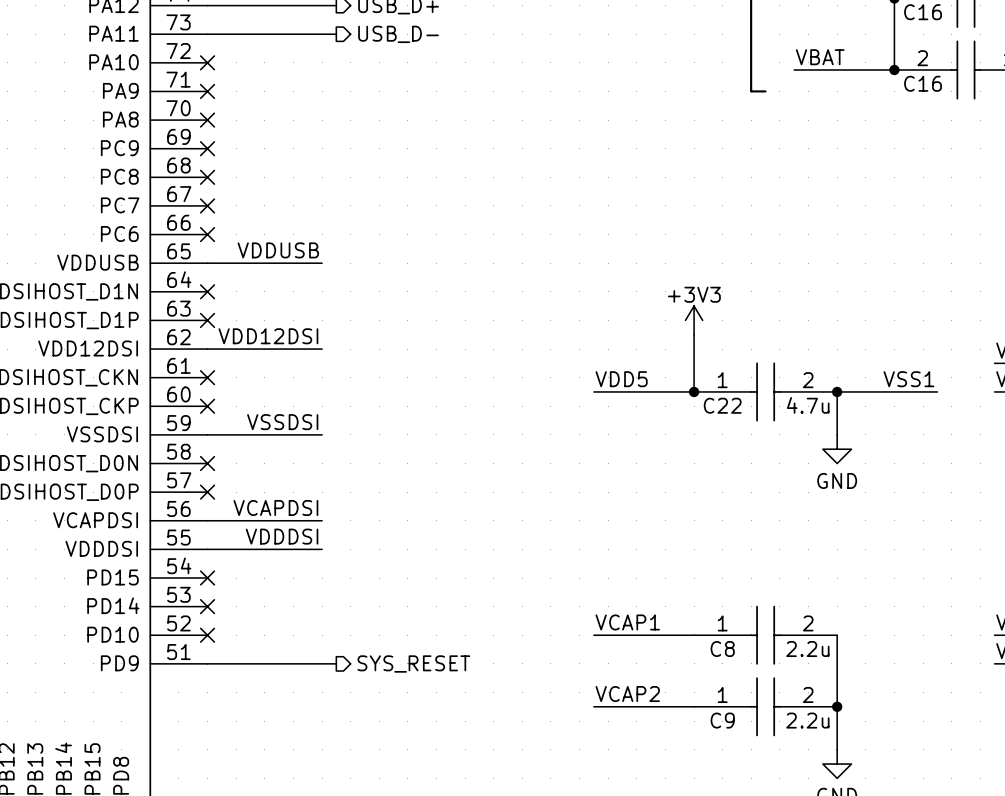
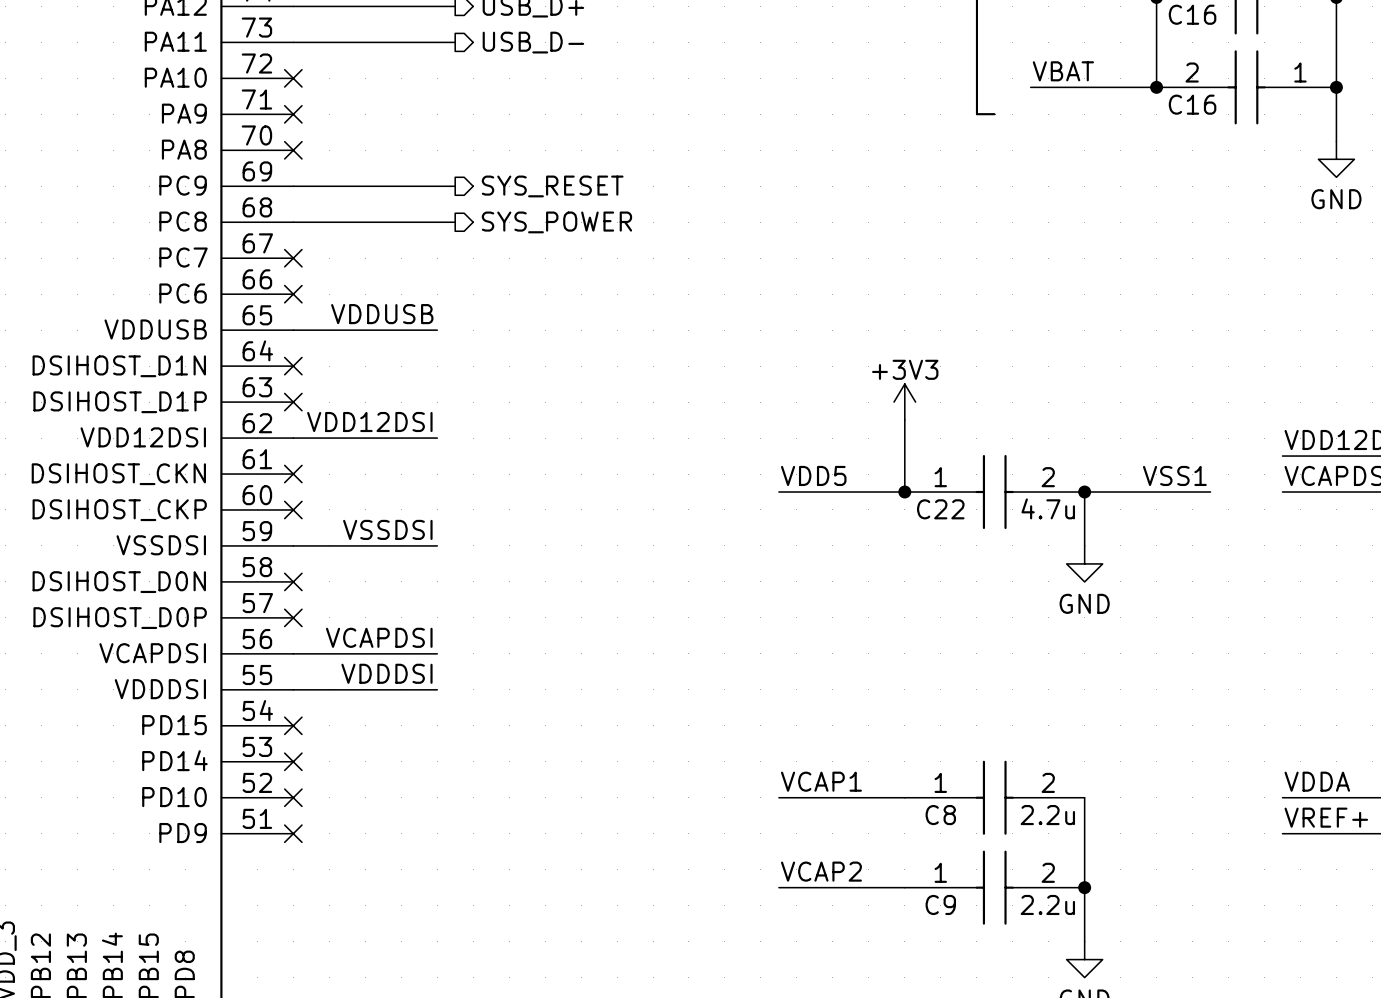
wire: none -> (293, 186) (455, 186)
no-connect mark: (207, 148) -> none
hierarchical label: none -> SYS_RESET (552, 186)
wire: none -> (293, 222) (455, 222)
no-connect mark: (207, 177) -> none
hierarchical label: none -> SYS_POWER (556, 222)
wire: (207, 663) (336, 663) -> none
no-connect mark: none -> (293, 833)
hierarchical label: SYS_RESET (413, 664) -> none

